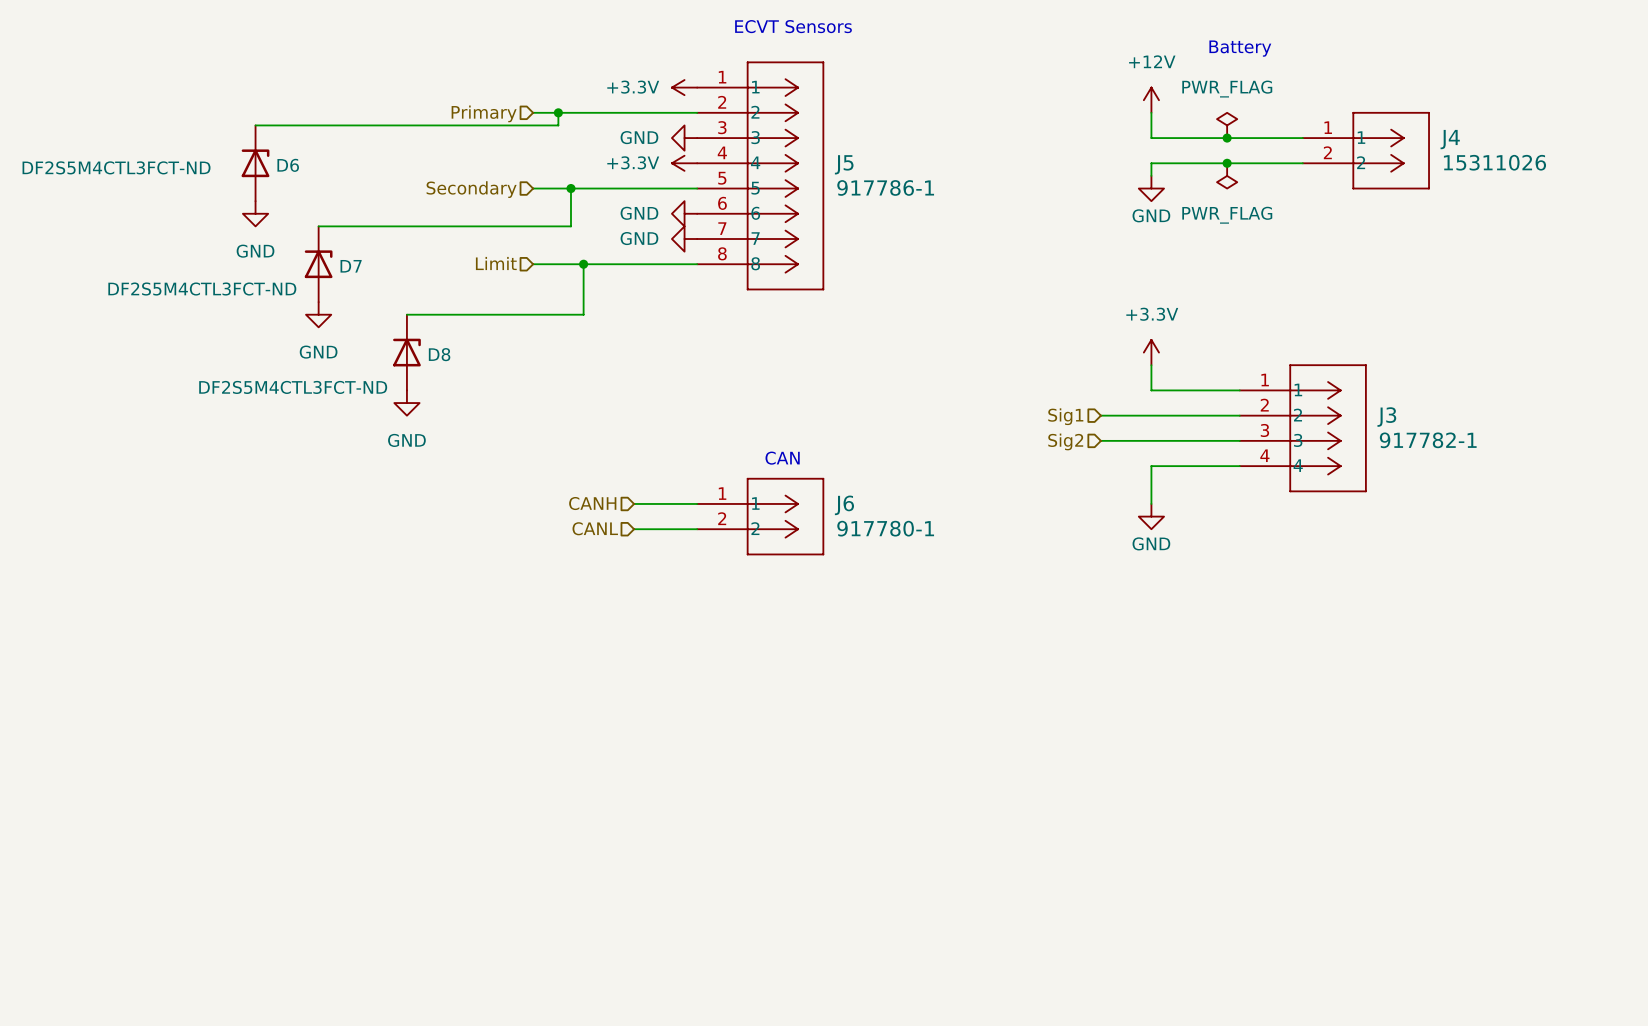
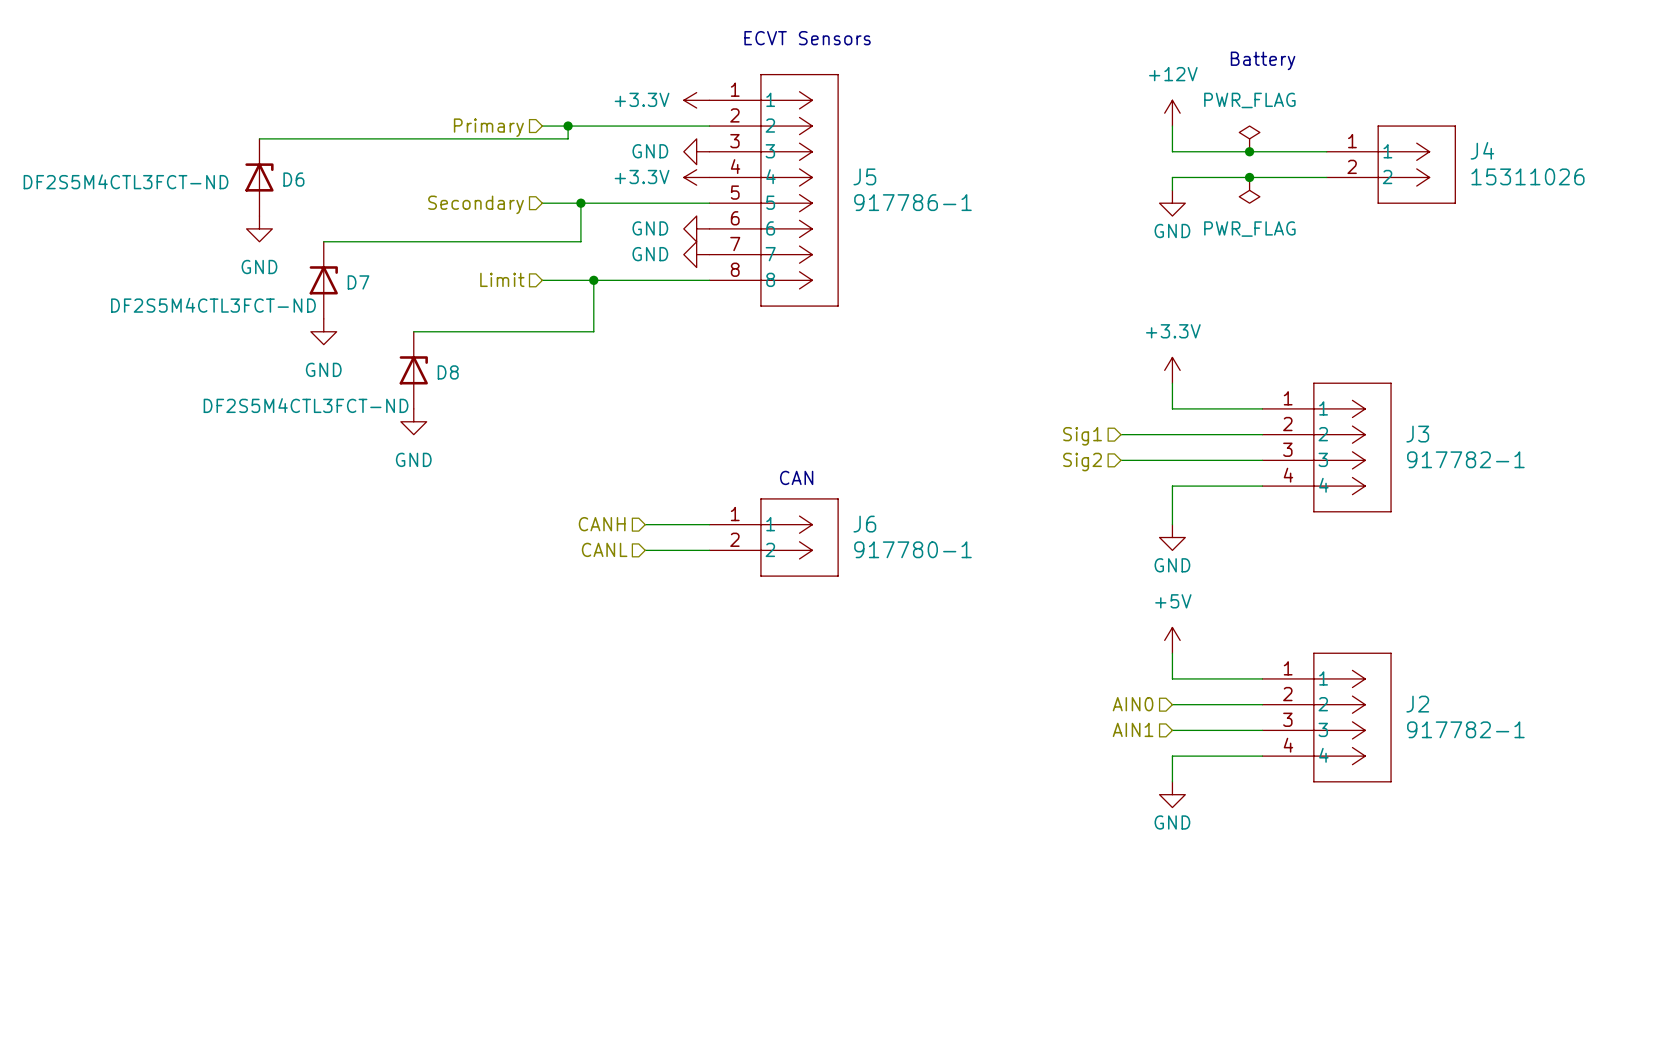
power symbol: none -> +5V (1172, 640)
wire: none -> (1172, 653) (1172, 678) (1262, 678)
hierarchical label: none -> AIN0 (1133, 704)
wire: none -> (1172, 704) (1262, 704)
J2: none -> 917782-1 (1327, 717)
hierarchical label: none -> AIN1 (1133, 729)
wire: none -> (1172, 730) (1262, 730)
wire: none -> (1262, 756) (1172, 756) (1172, 781)
power symbol: none -> GND (1172, 794)

